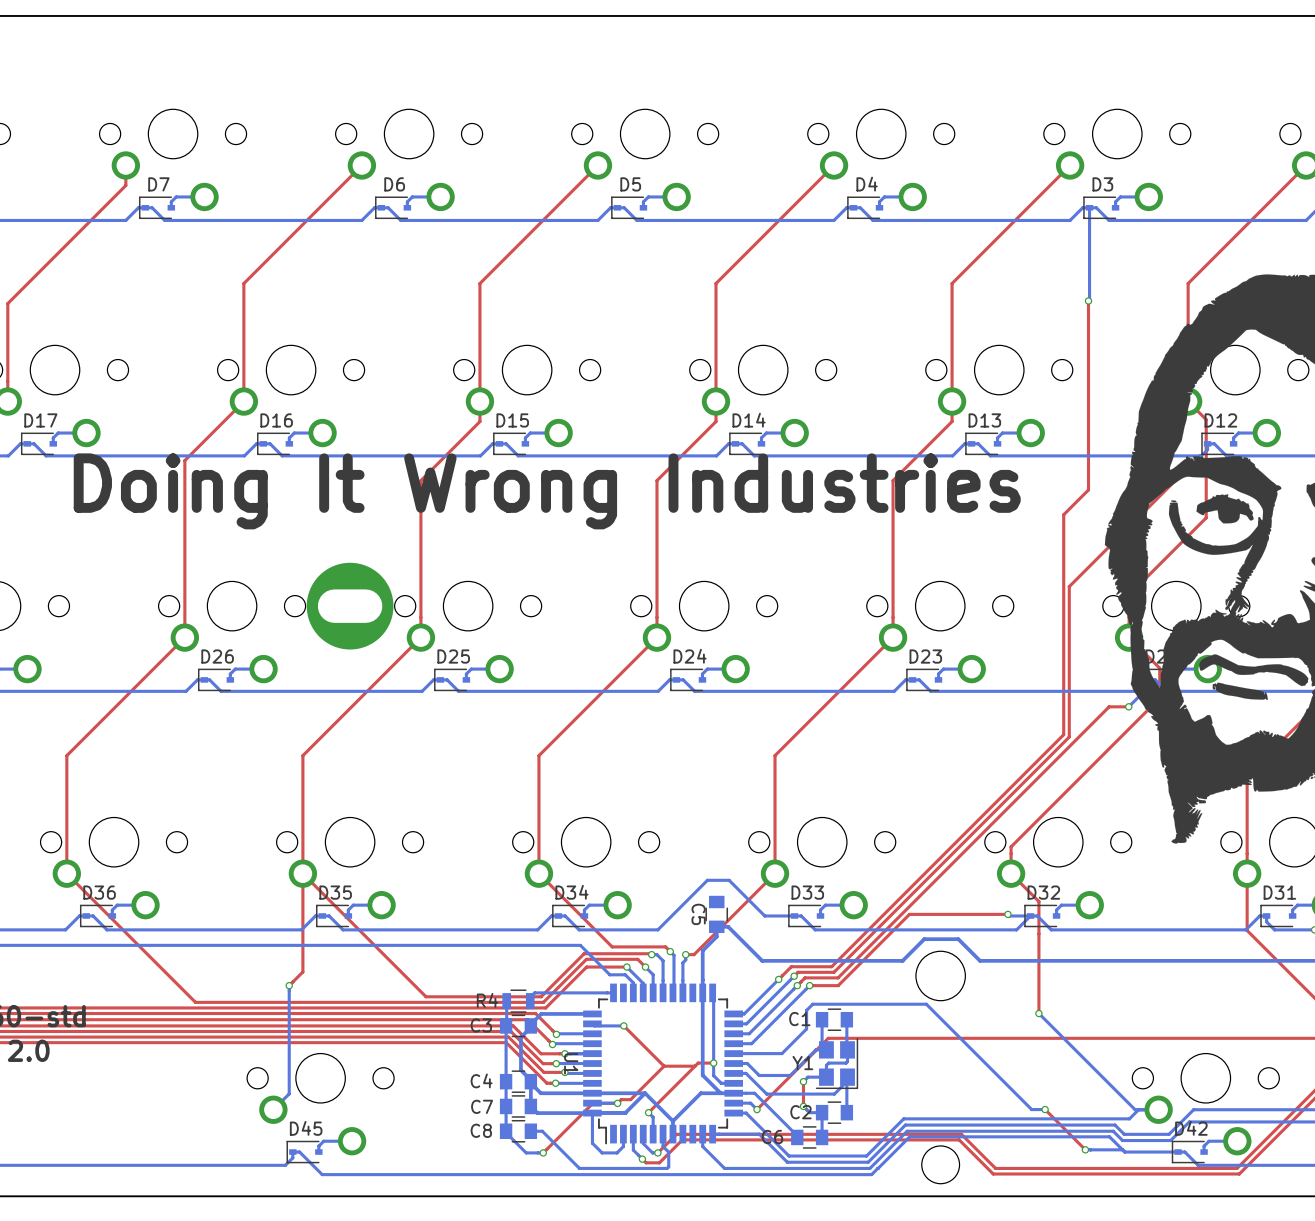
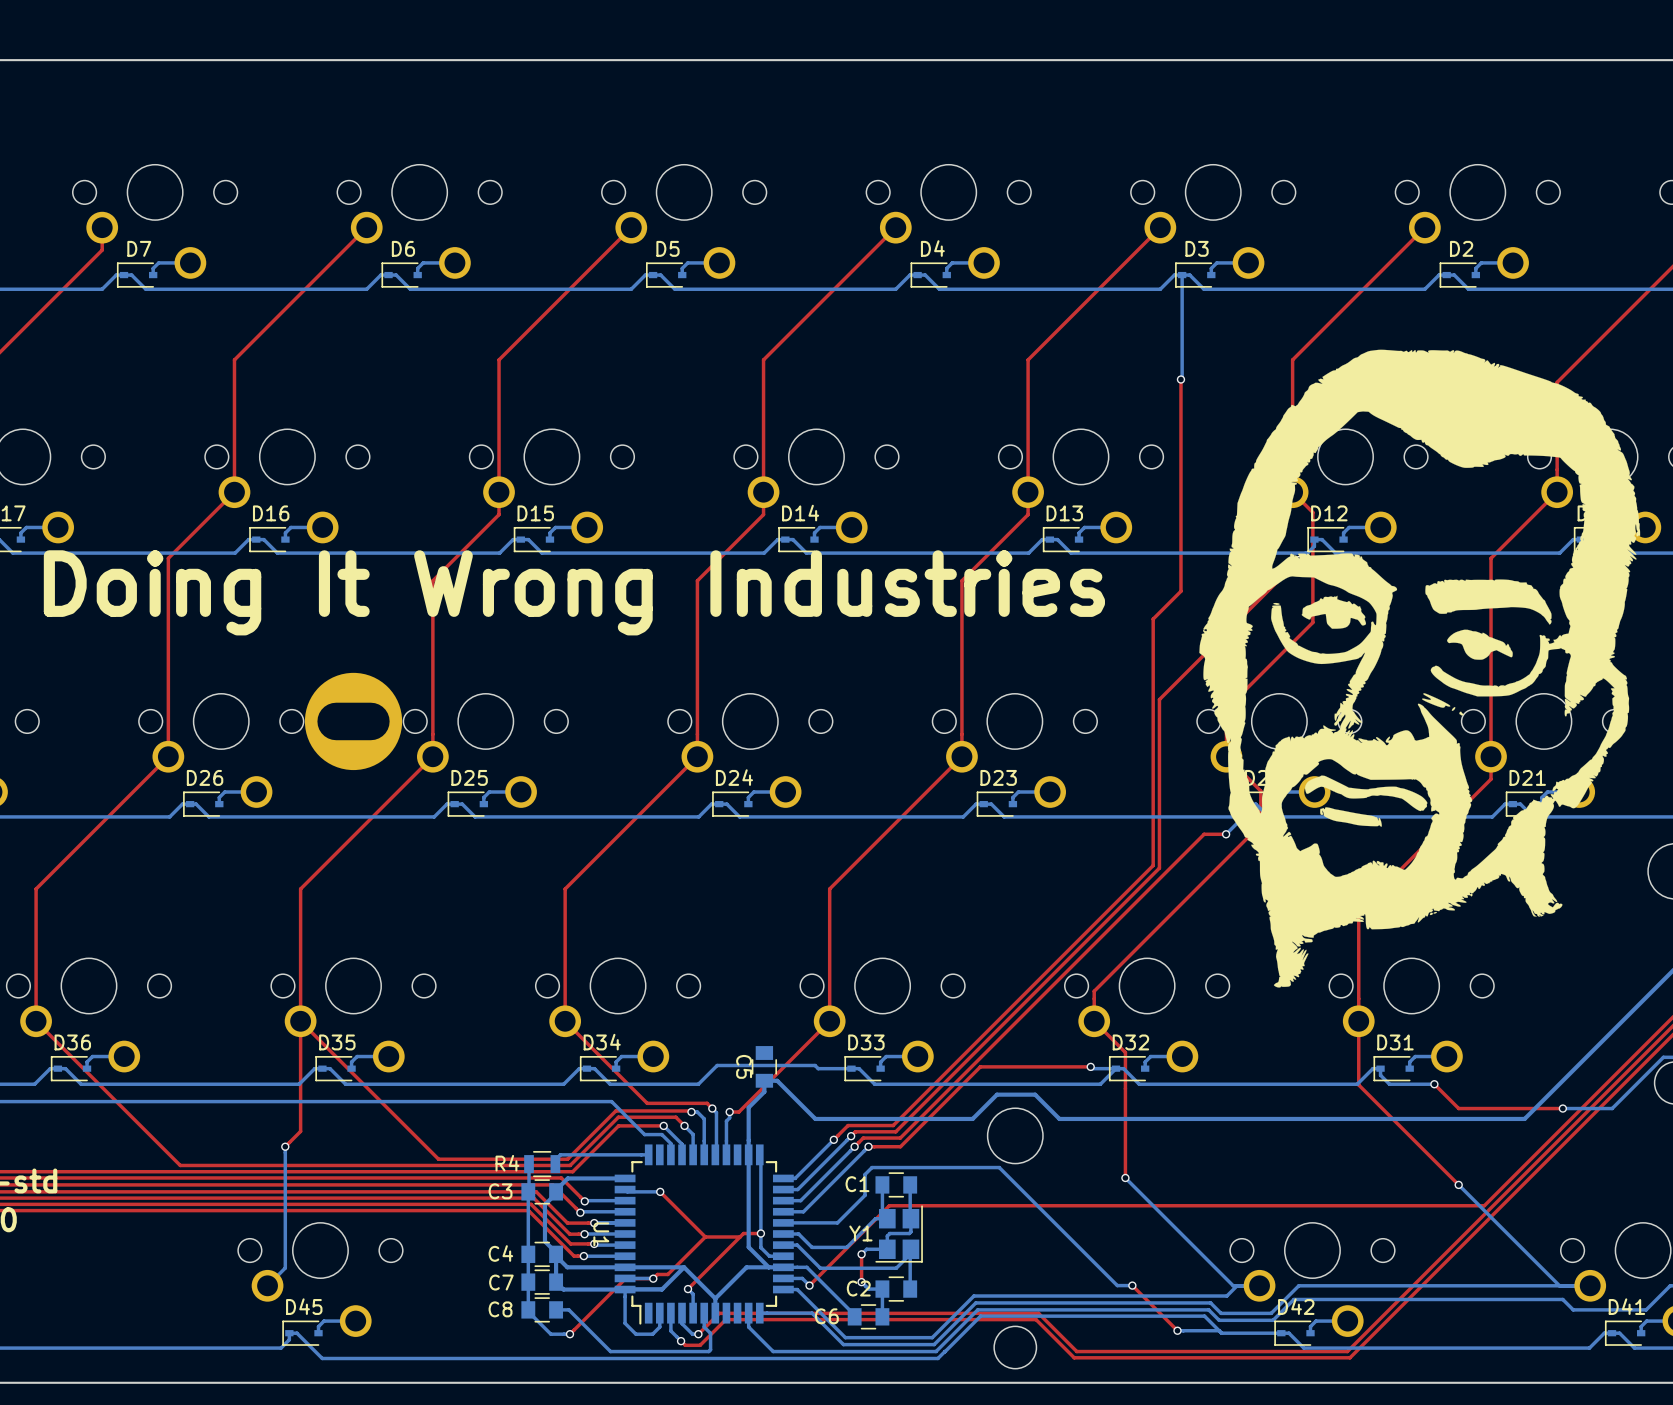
bottom track: (761, 913) (729, 880) (707, 880) (674, 913) -> (815, 1065) (717, 1065)

